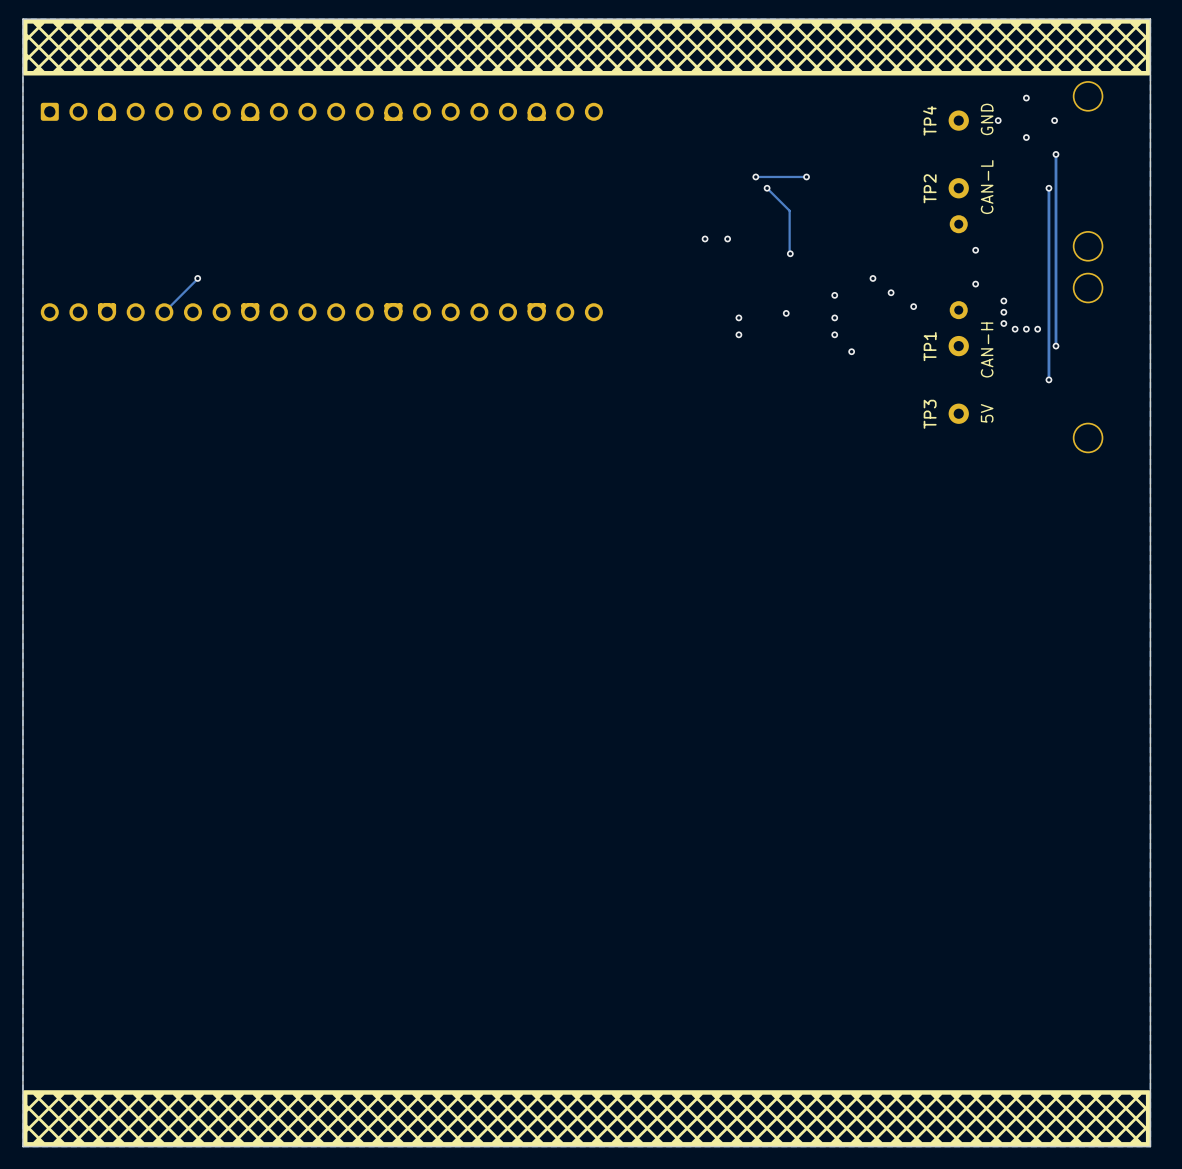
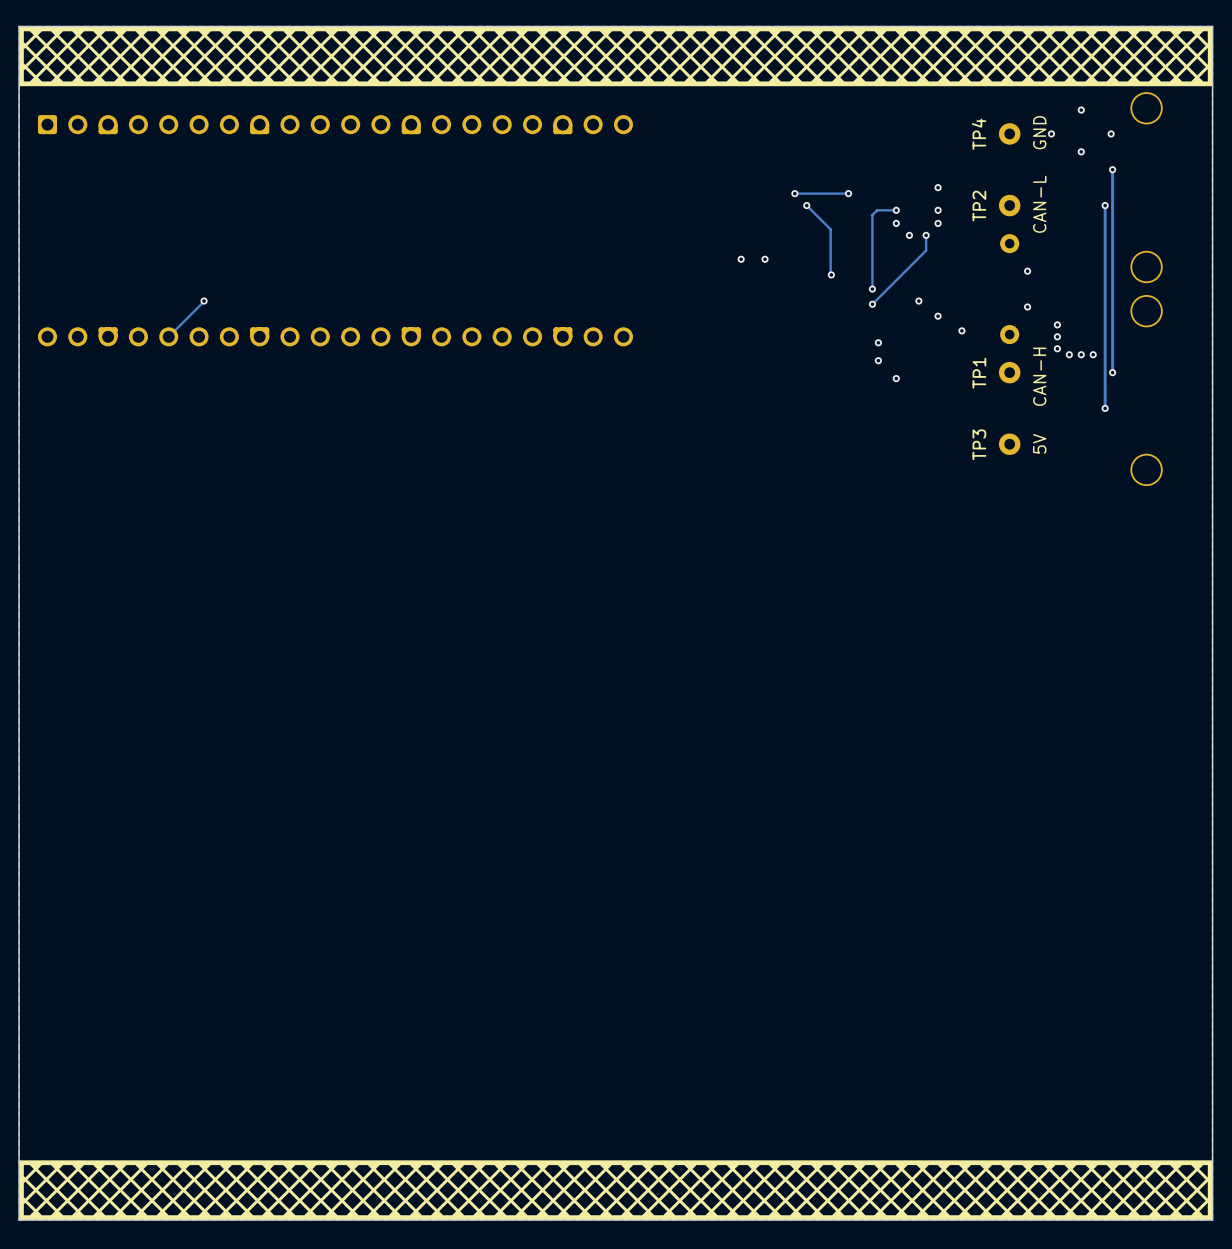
via: none -> (938, 187)
track: none -> (896, 210) (877, 210) (872, 215) (872, 289)
via: none -> (896, 210)
via: none -> (938, 210)
via: none -> (896, 223)
via: none -> (938, 223)
via: none -> (909, 235)
track: none -> (926, 235) (926, 250) (872, 304)
via: none -> (926, 235)
via: none -> (872, 289)
via: none -> (872, 304)
via: (834, 295) -> none
via: (786, 313) -> none
via: (738, 317) -> none
via: (738, 334) -> none

